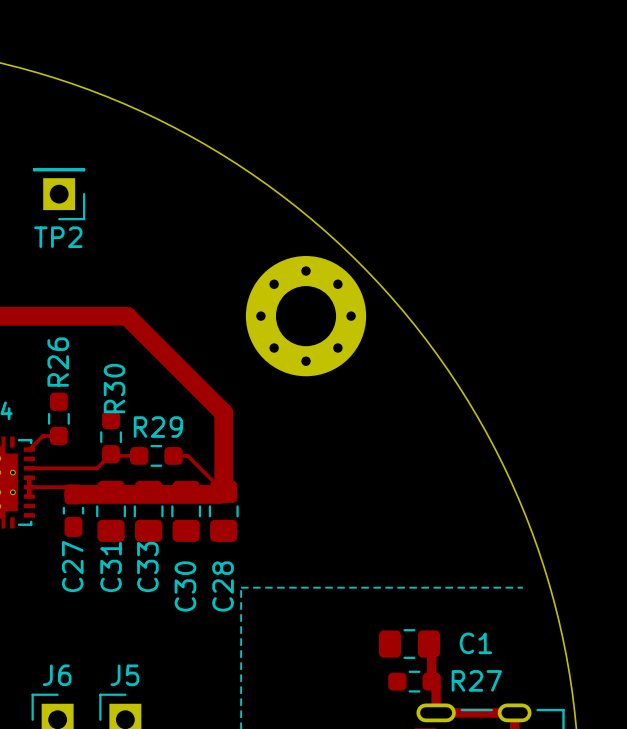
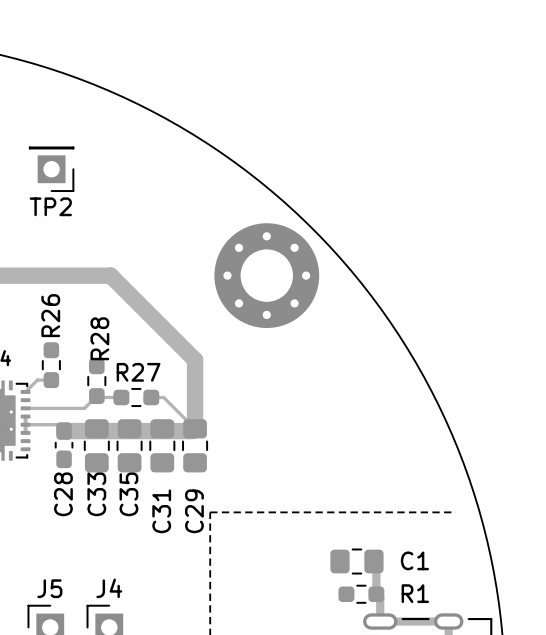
R30 name: R30 (114, 388) -> R28 (99, 338)
R29 name: R29 (158, 427) -> R27 (138, 372)
C27 name: C27 (72, 566) -> C28 (63, 494)
C31 name: C31 (111, 566) -> C33 (96, 494)
C33 name: C33 (147, 566) -> C35 (128, 494)
C30 name: C30 (185, 586) -> C31 (161, 511)
C28 name: C28 (223, 586) -> C29 (194, 511)
J6 name: J6 (57, 675) -> J5 (49, 588)
J5 name: J5 (124, 675) -> J4 (109, 588)
R27 name: R27 (476, 680) -> R1 (415, 593)

